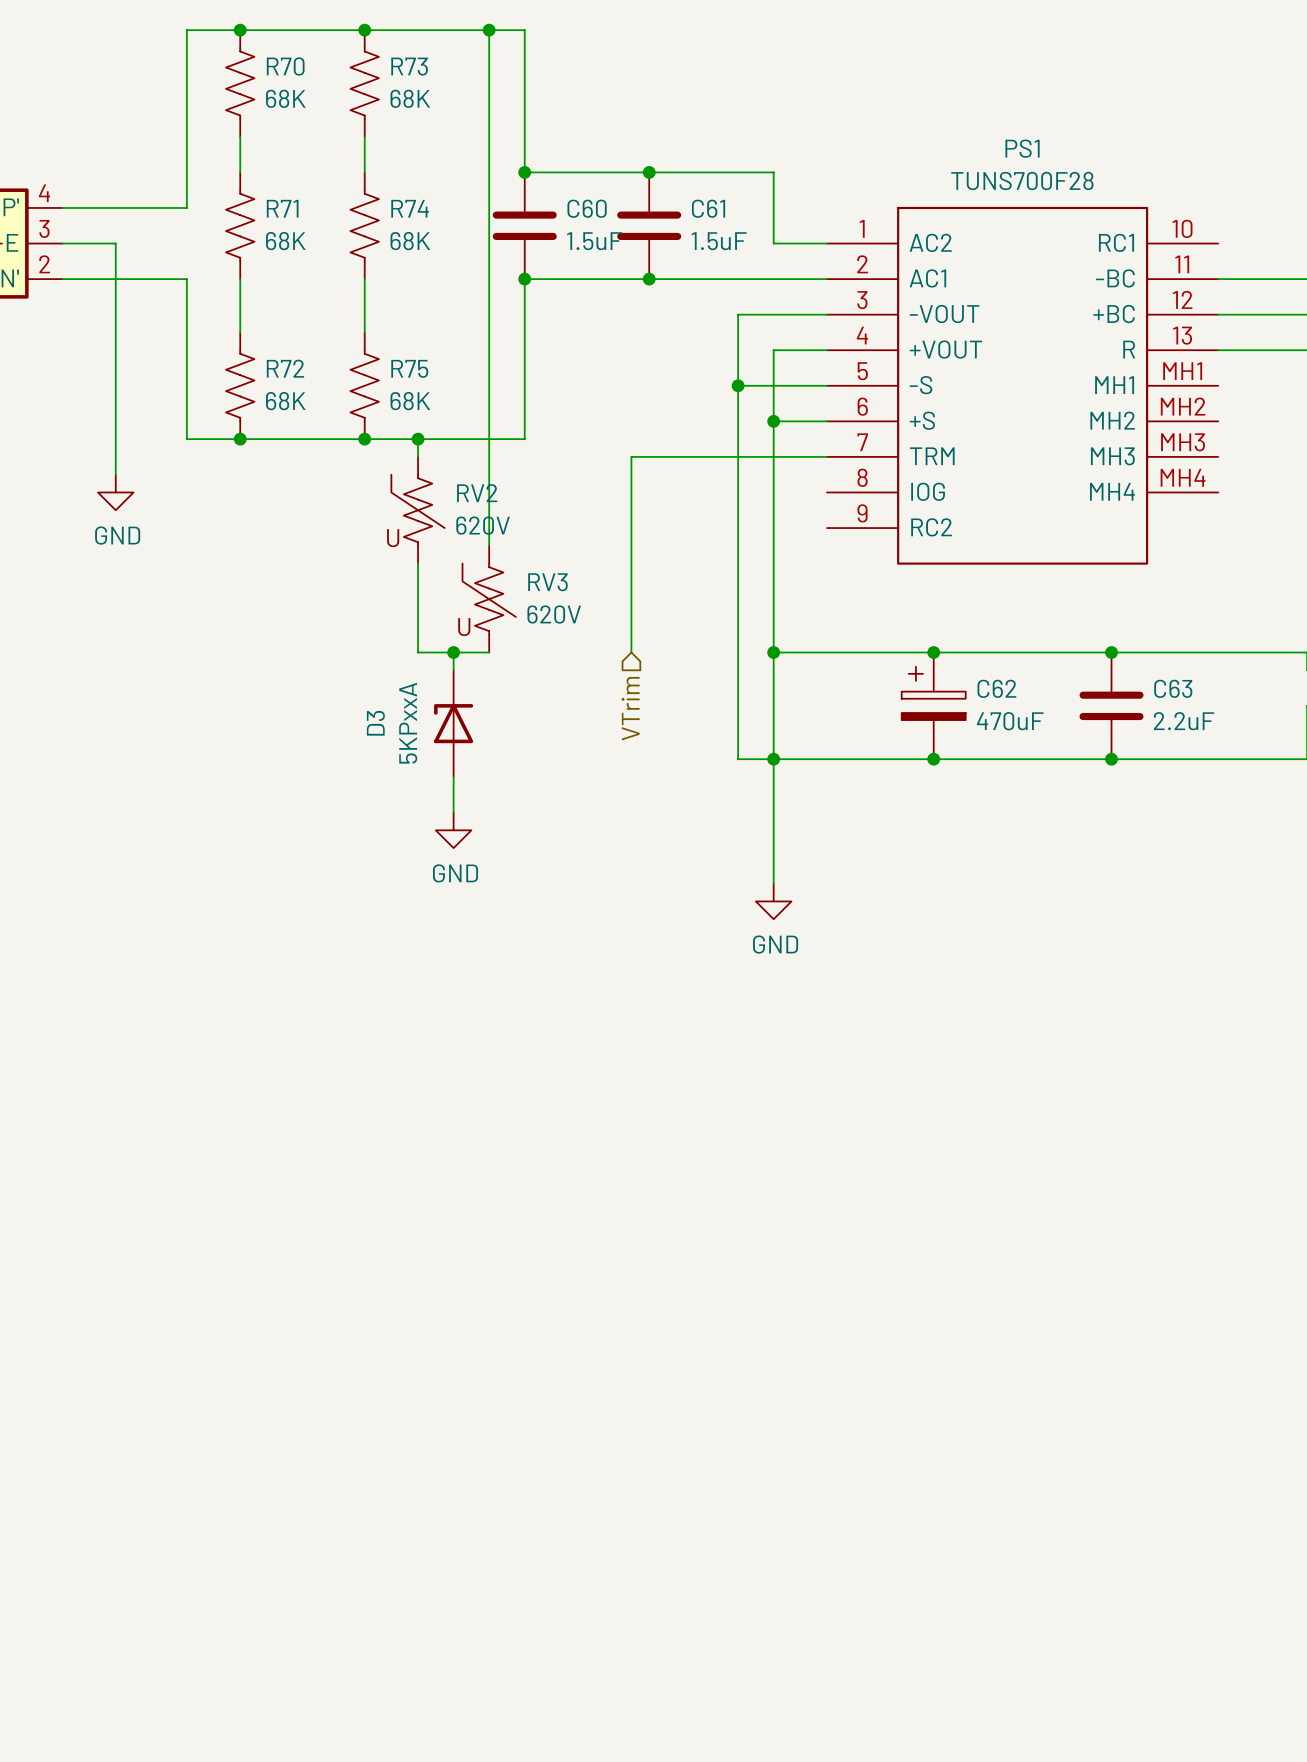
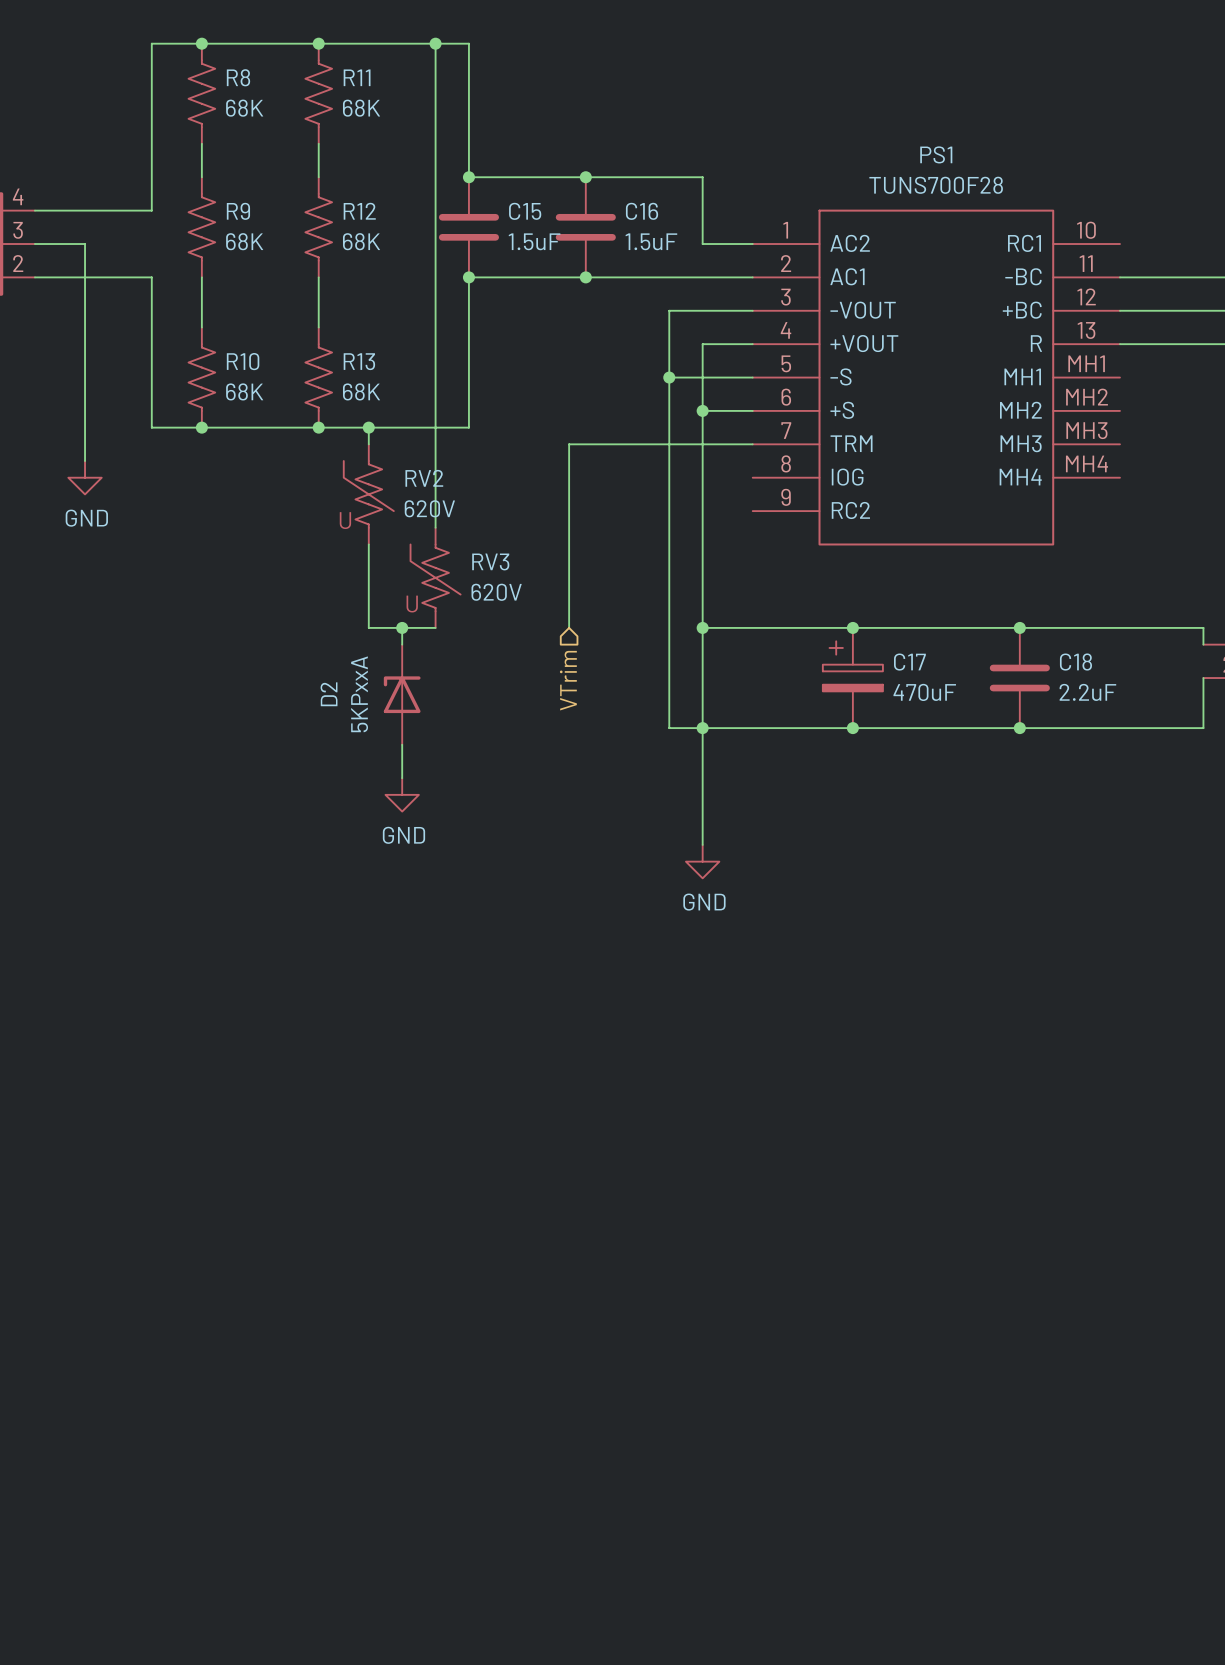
R70 name: R70 (285, 66) -> R8 (238, 77)
R73 name: R73 (409, 66) -> R11 (357, 77)
R71 name: R71 (282, 208) -> R9 (238, 211)
R74 name: R74 (410, 208) -> R12 (359, 211)
C60 name: C60 (587, 208) -> C15 (525, 211)
C61 name: C61 (708, 208) -> C16 (642, 211)
R72 name: R72 (285, 368) -> R10 (243, 361)
R75 name: R75 (409, 368) -> R13 (359, 361)
C62 name: C62 (996, 688) -> C17 (909, 662)
C63 name: C63 (1173, 688) -> C18 (1075, 662)
D3 name: D3 (375, 723) -> D2 (329, 694)

